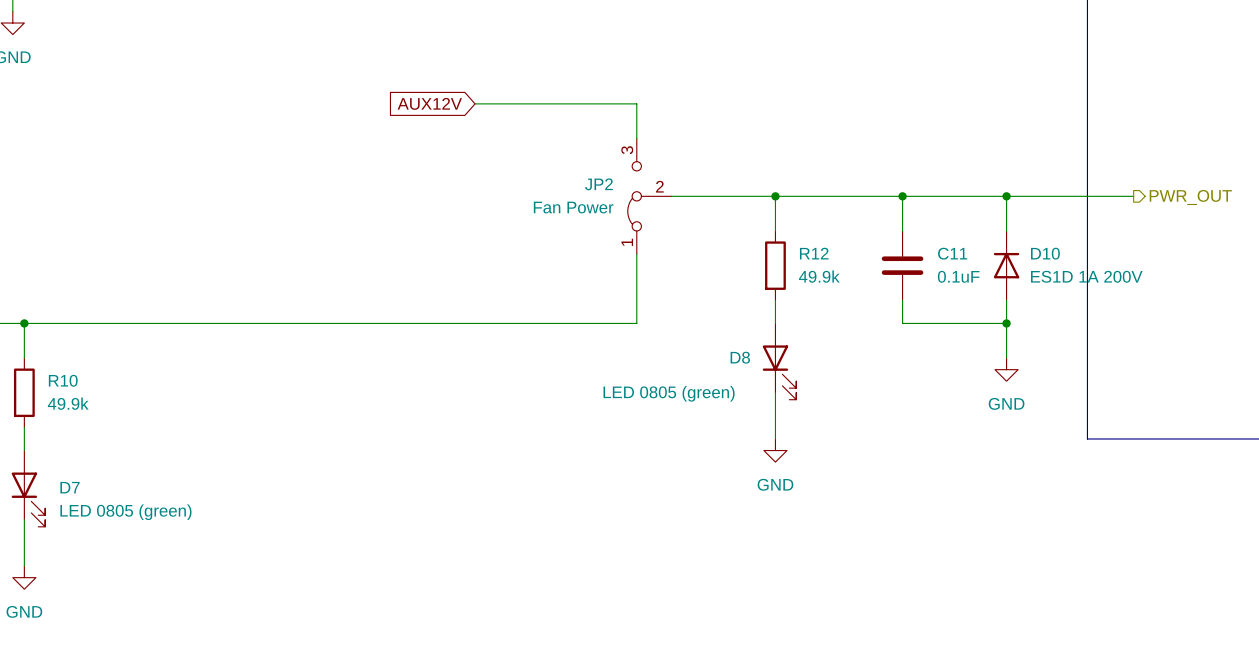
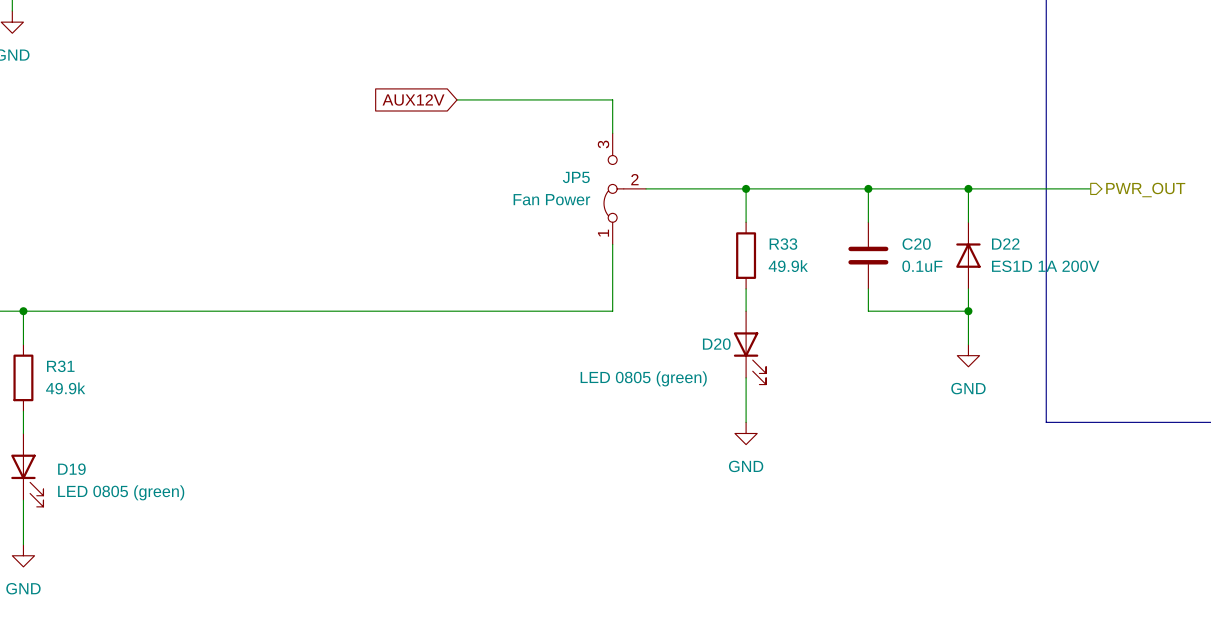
JP2 name: JP2 (598, 184) -> JP5 (576, 177)
R12 name: R12 (814, 253) -> R33 (783, 244)
C11 name: C11 (952, 253) -> C20 (916, 244)
D10 name: D10 (1045, 253) -> D22 (1005, 243)
D8 name: D8 (740, 357) -> D20 (716, 344)
R10 name: R10 (63, 380) -> R31 (60, 366)
D7 name: D7 (70, 487) -> D19 (71, 469)

